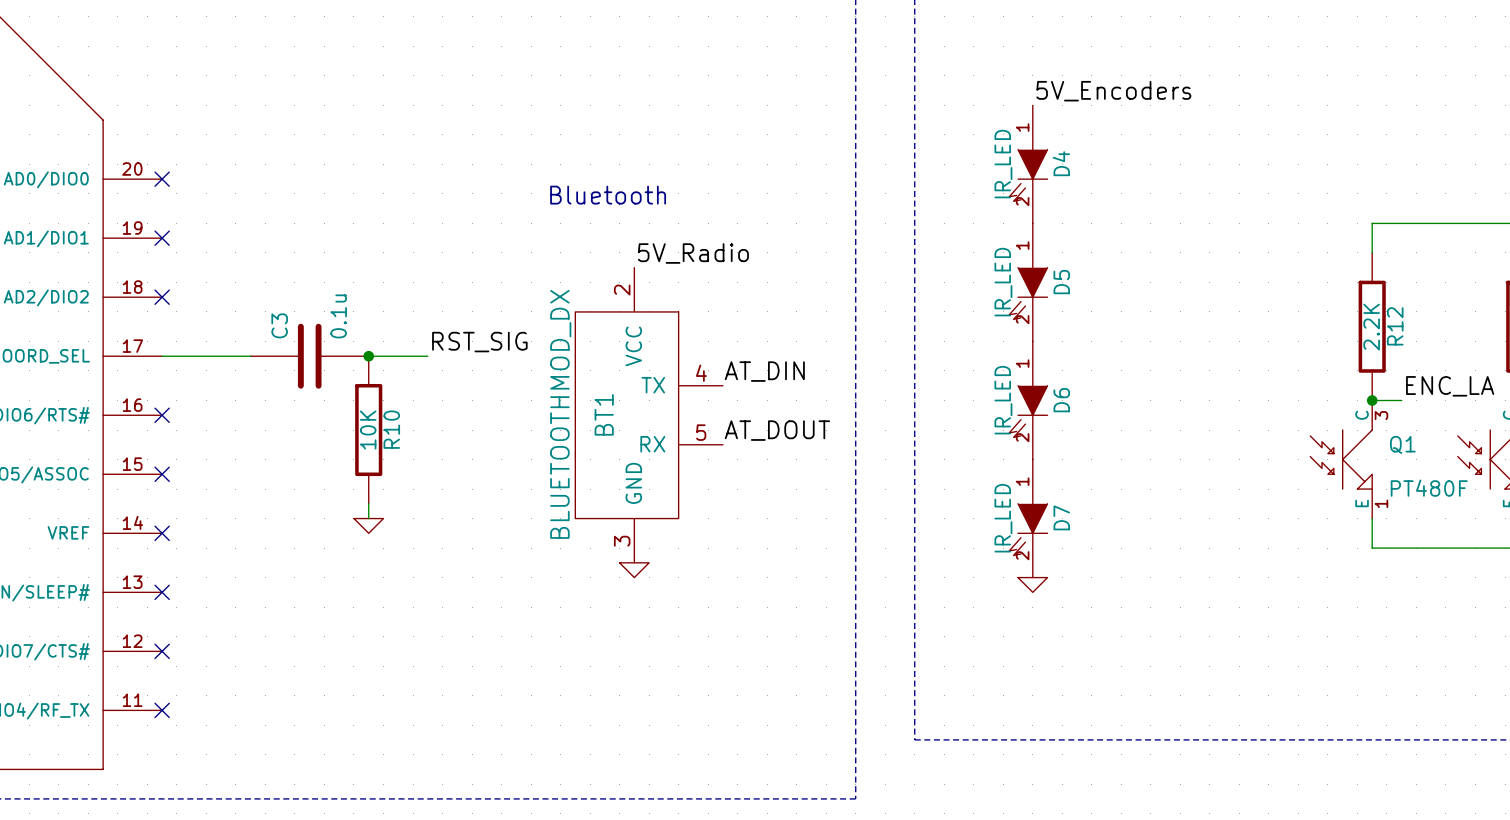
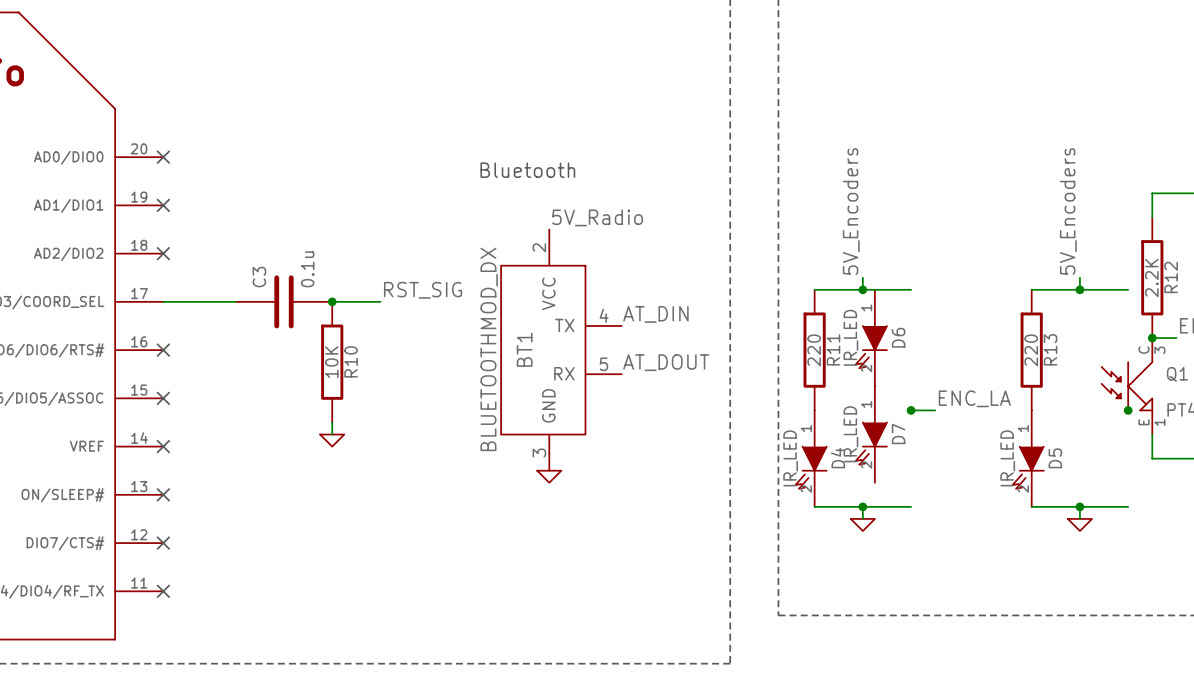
label: 5V_Encoders (1113, 91) -> none
D4 position: (1028, 164) -> (811, 458)
label: none -> 5V_Encoders (851, 211)
label: none -> 5V_Encoders (1068, 211)
D5 position: (1028, 282) -> (1028, 458)
wire: none -> (862, 277) (862, 289)
wire: none -> (1079, 277) (1079, 289)
wire: none -> (814, 289) (911, 289)
junction: none -> (862, 289)
wire: none -> (1031, 289) (1128, 289)
junction: none -> (1079, 289)
R11: none -> 220 (814, 350)
R13: none -> 220 (1031, 350)
label: none -> ENC_LA (974, 398)
wire: none -> (911, 410) (935, 410)
junction: none -> (911, 410)
junction: none -> (1128, 410)
power symbol position: (1032, 584) -> (862, 524)
wire: none -> (814, 506) (911, 506)
wire: none -> (862, 506) (862, 518)
junction: none -> (862, 506)
wire: none -> (1031, 506) (1128, 506)
wire: none -> (1079, 506) (1079, 518)
junction: none -> (1079, 506)
power symbol: none -> (1079, 524)

